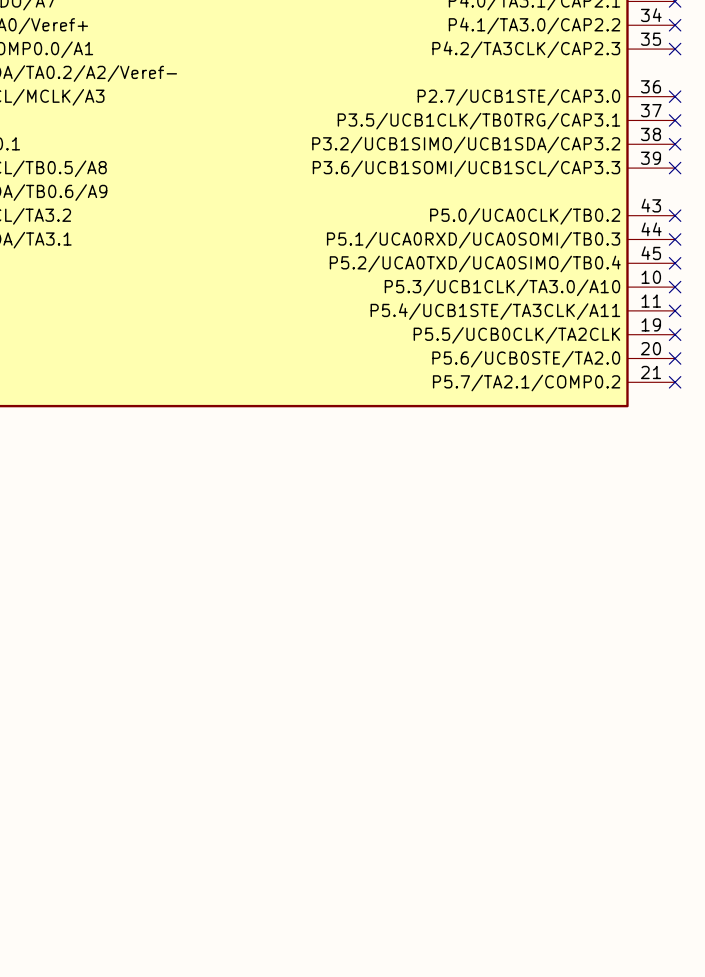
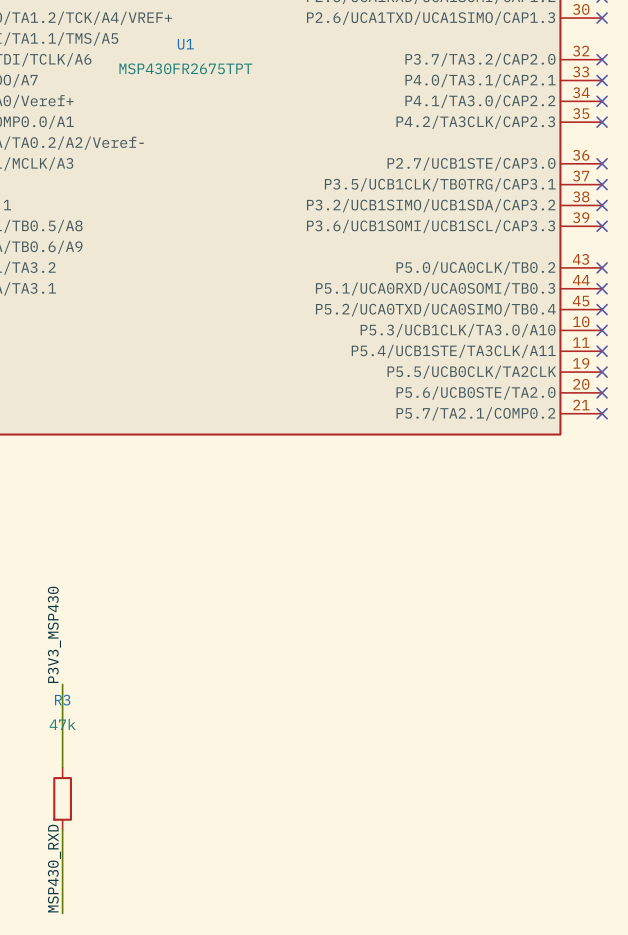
label: none -> P3V3_MSP430 (54, 634)
wire: none -> (62, 684) (62, 767)
R3: none -> 47k (62, 798)
wire: none -> (62, 830) (62, 913)
label: none -> MSP430_RXD (54, 868)

